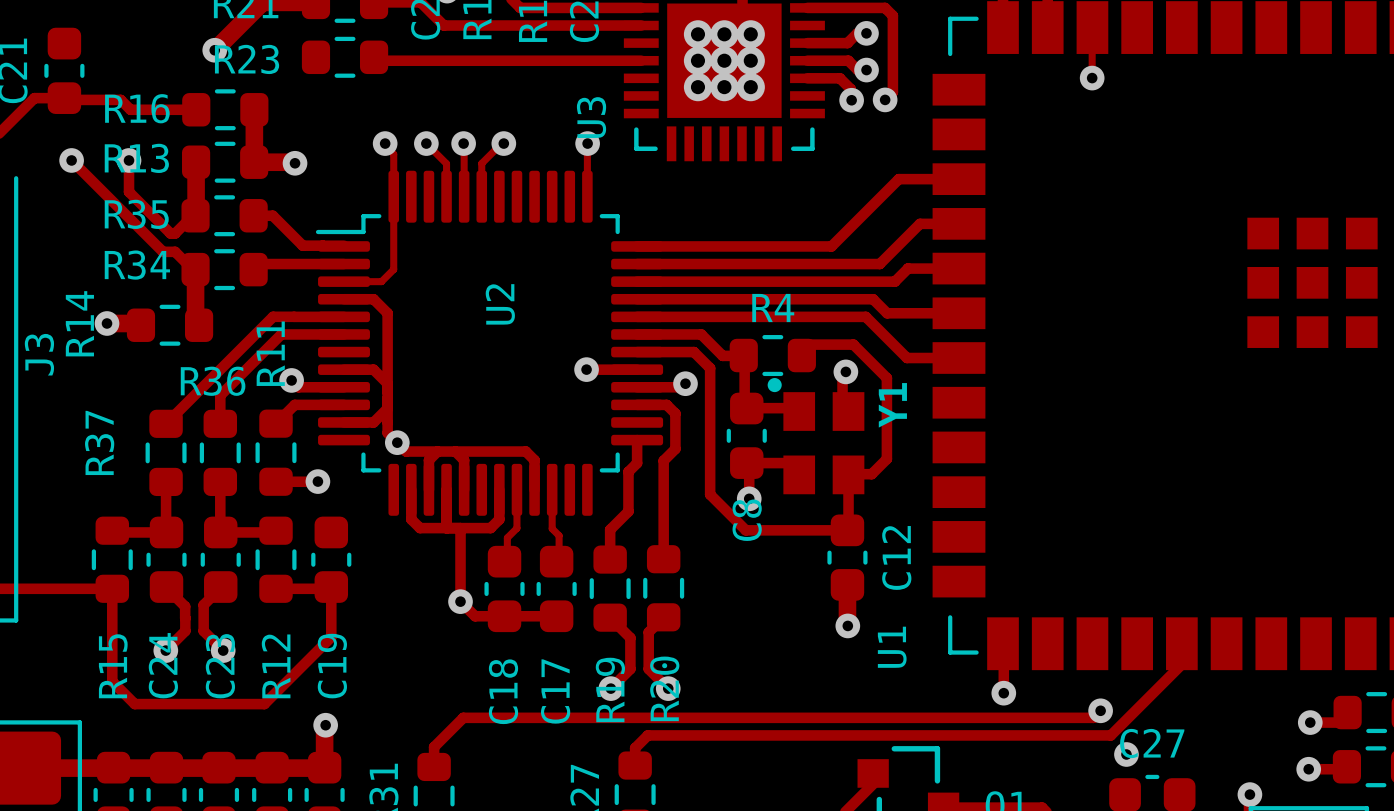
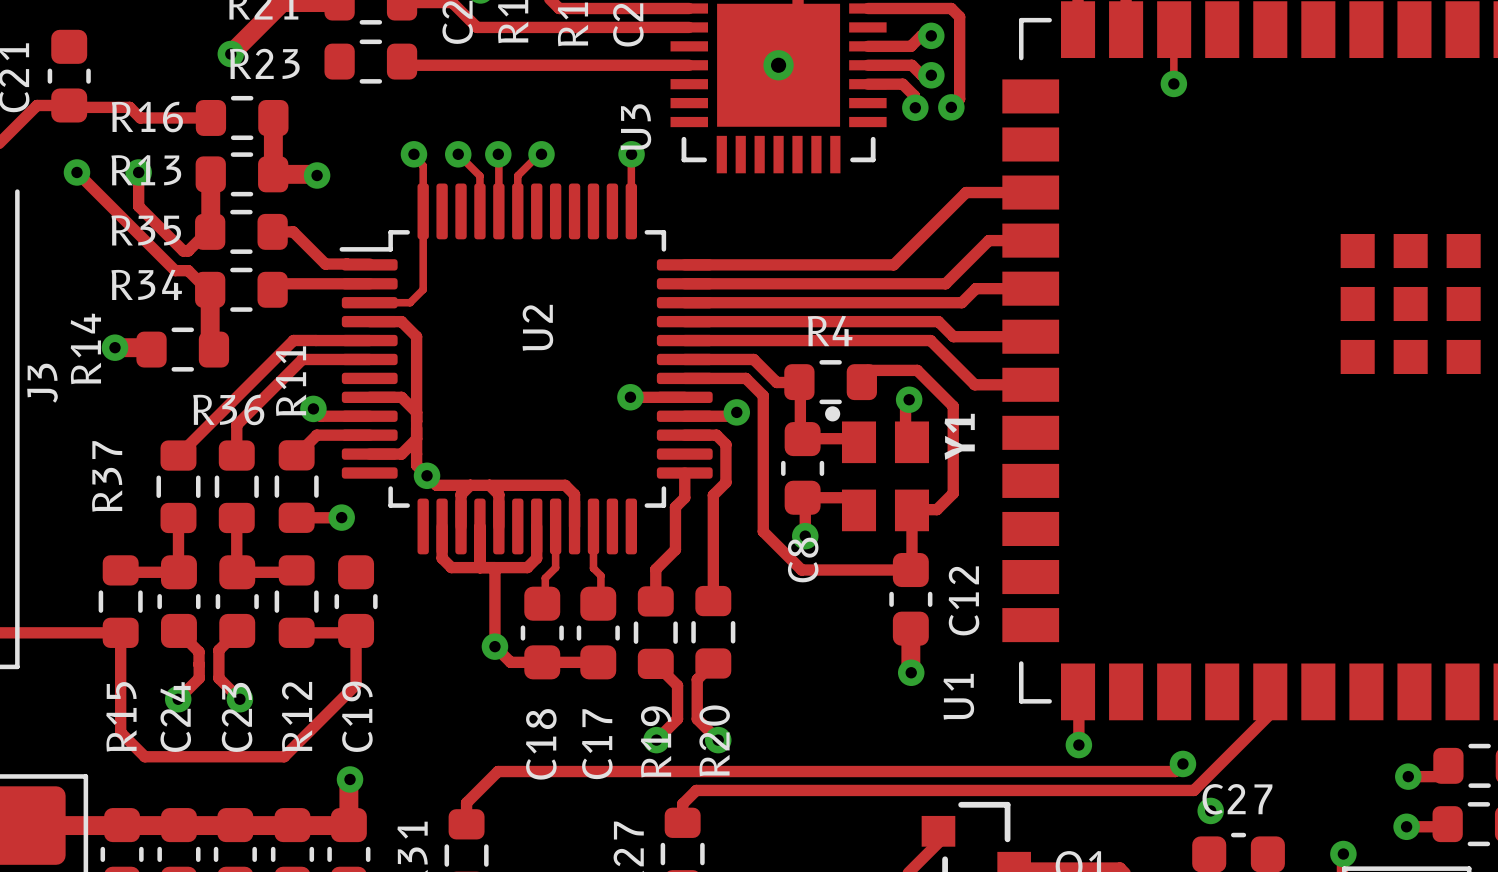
via: (697, 34) -> none
via: (724, 34) -> none
via: (750, 34) -> none
via: (697, 60) -> none
via: (750, 60) -> none
via: (697, 87) -> none
via: (724, 87) -> none
via: (750, 87) -> none

